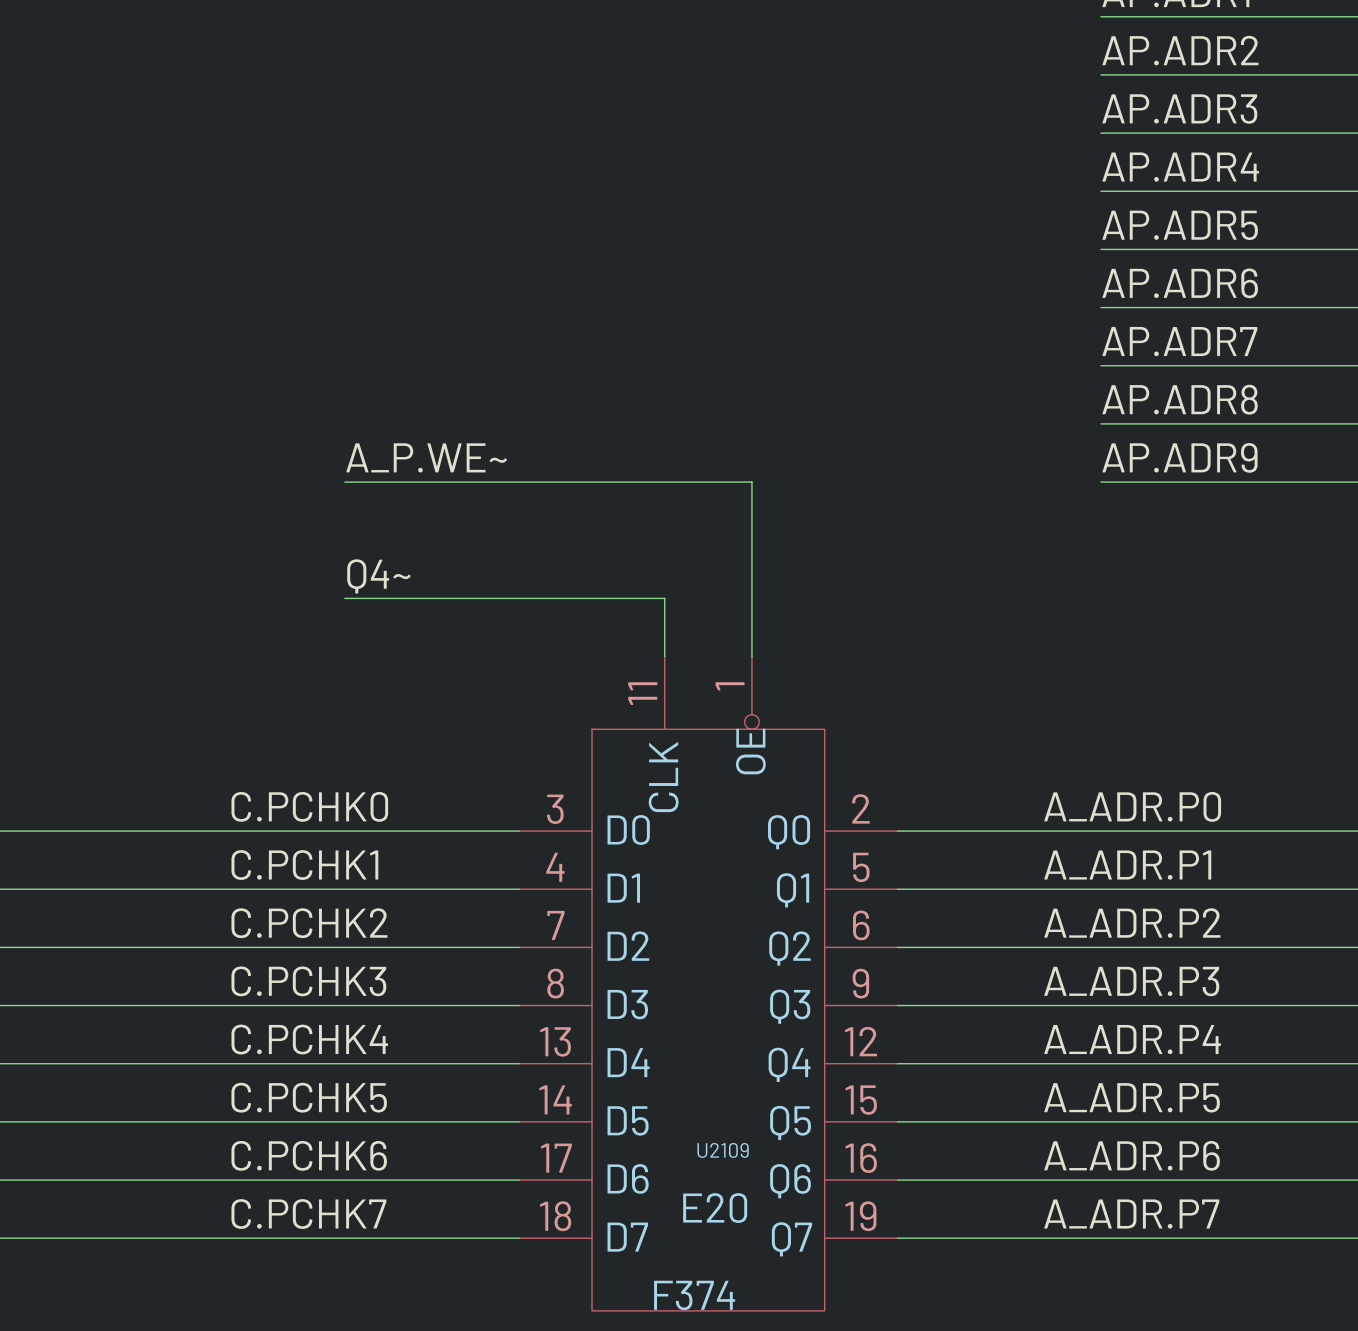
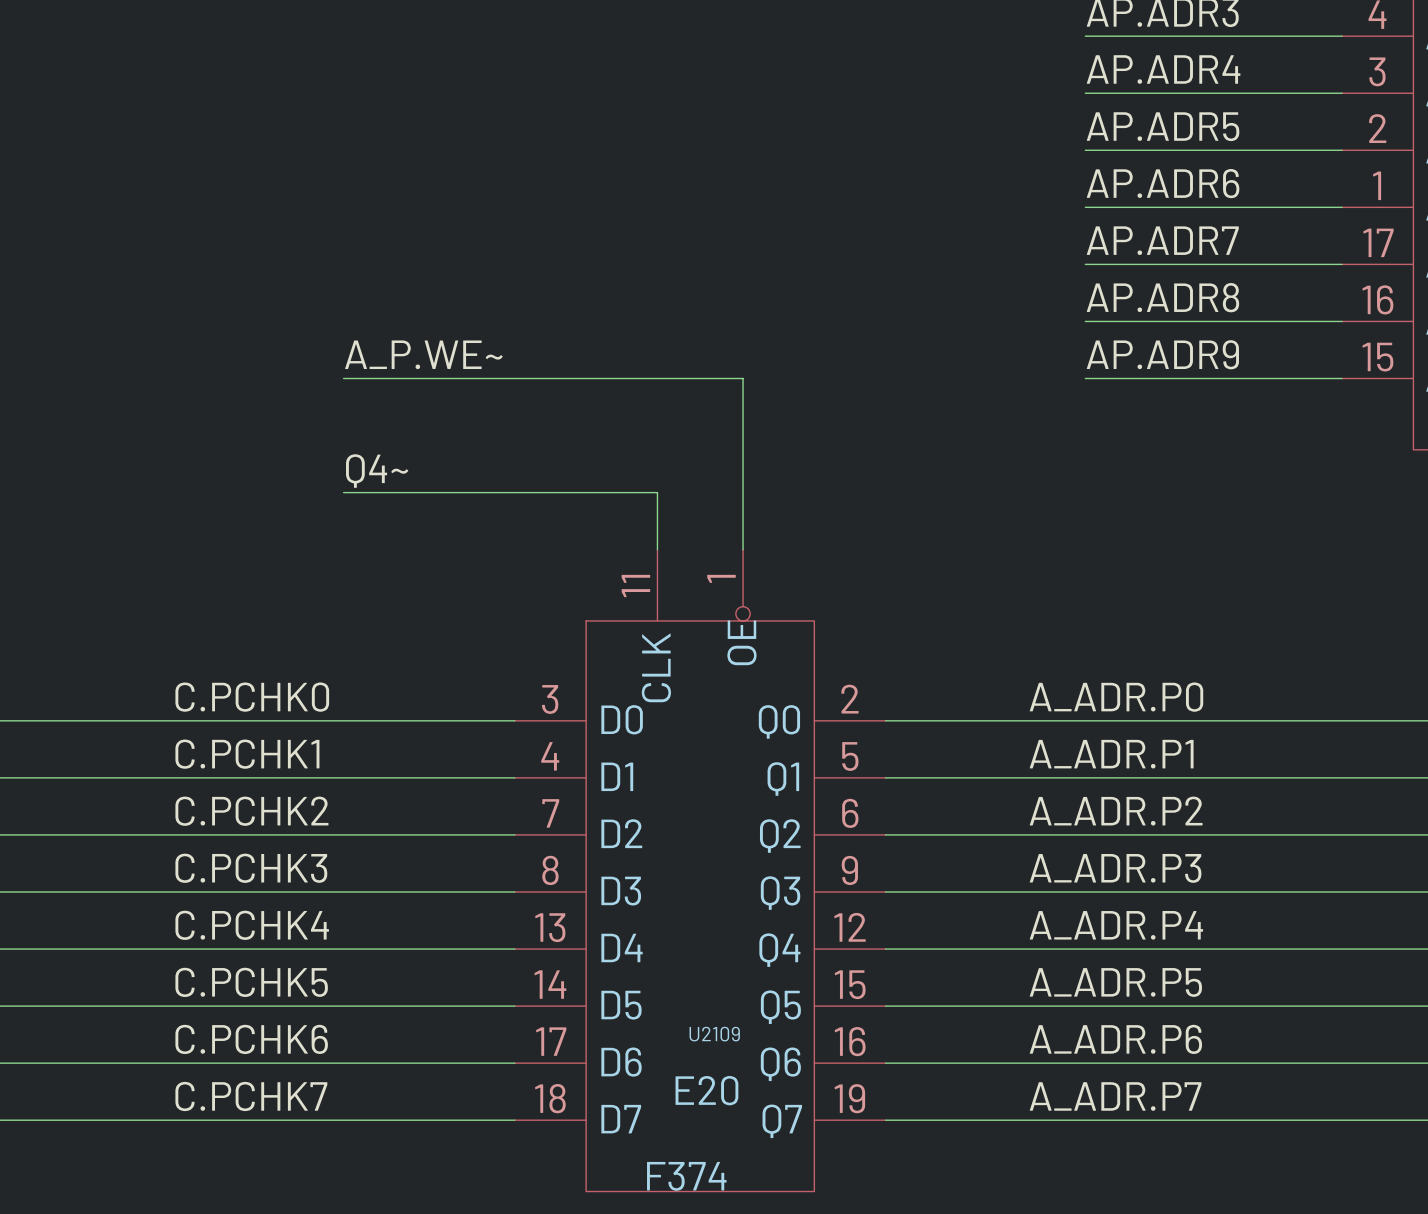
label position: C.PCHK0 (309, 806) -> C.PCHK0 (252, 697)
label position: C.PCHK1 (304, 865) -> C.PCHK1 (247, 754)
label position: C.PCHK2 (309, 923) -> C.PCHK2 (251, 811)
label position: C.PCHK3 (308, 981) -> C.PCHK3 (251, 868)
label position: C.PCHK4 (309, 1039) -> C.PCHK4 (252, 925)
label position: C.PCHK5 (309, 1097) -> C.PCHK5 (251, 982)
label position: C.PCHK6 (309, 1155) -> C.PCHK6 (251, 1039)
label position: C.PCHK7 (308, 1214) -> C.PCHK7 (251, 1096)

